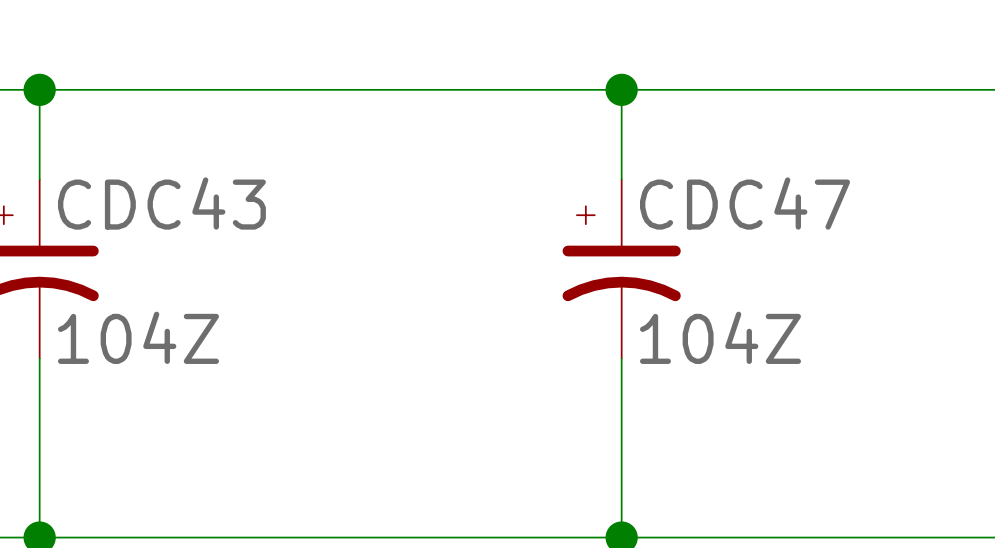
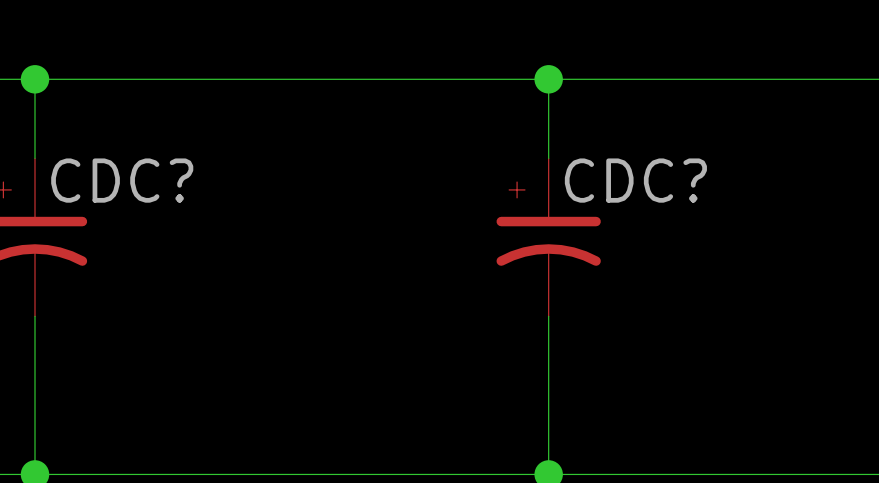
CDC43 name: CDC43 (161, 203) -> CDC? (122, 180)
CDC47 name: CDC47 (745, 203) -> CDC? (635, 180)
CDC43 value: 104Z (138, 337) -> none
CDC47 value: 104Z (720, 337) -> none

